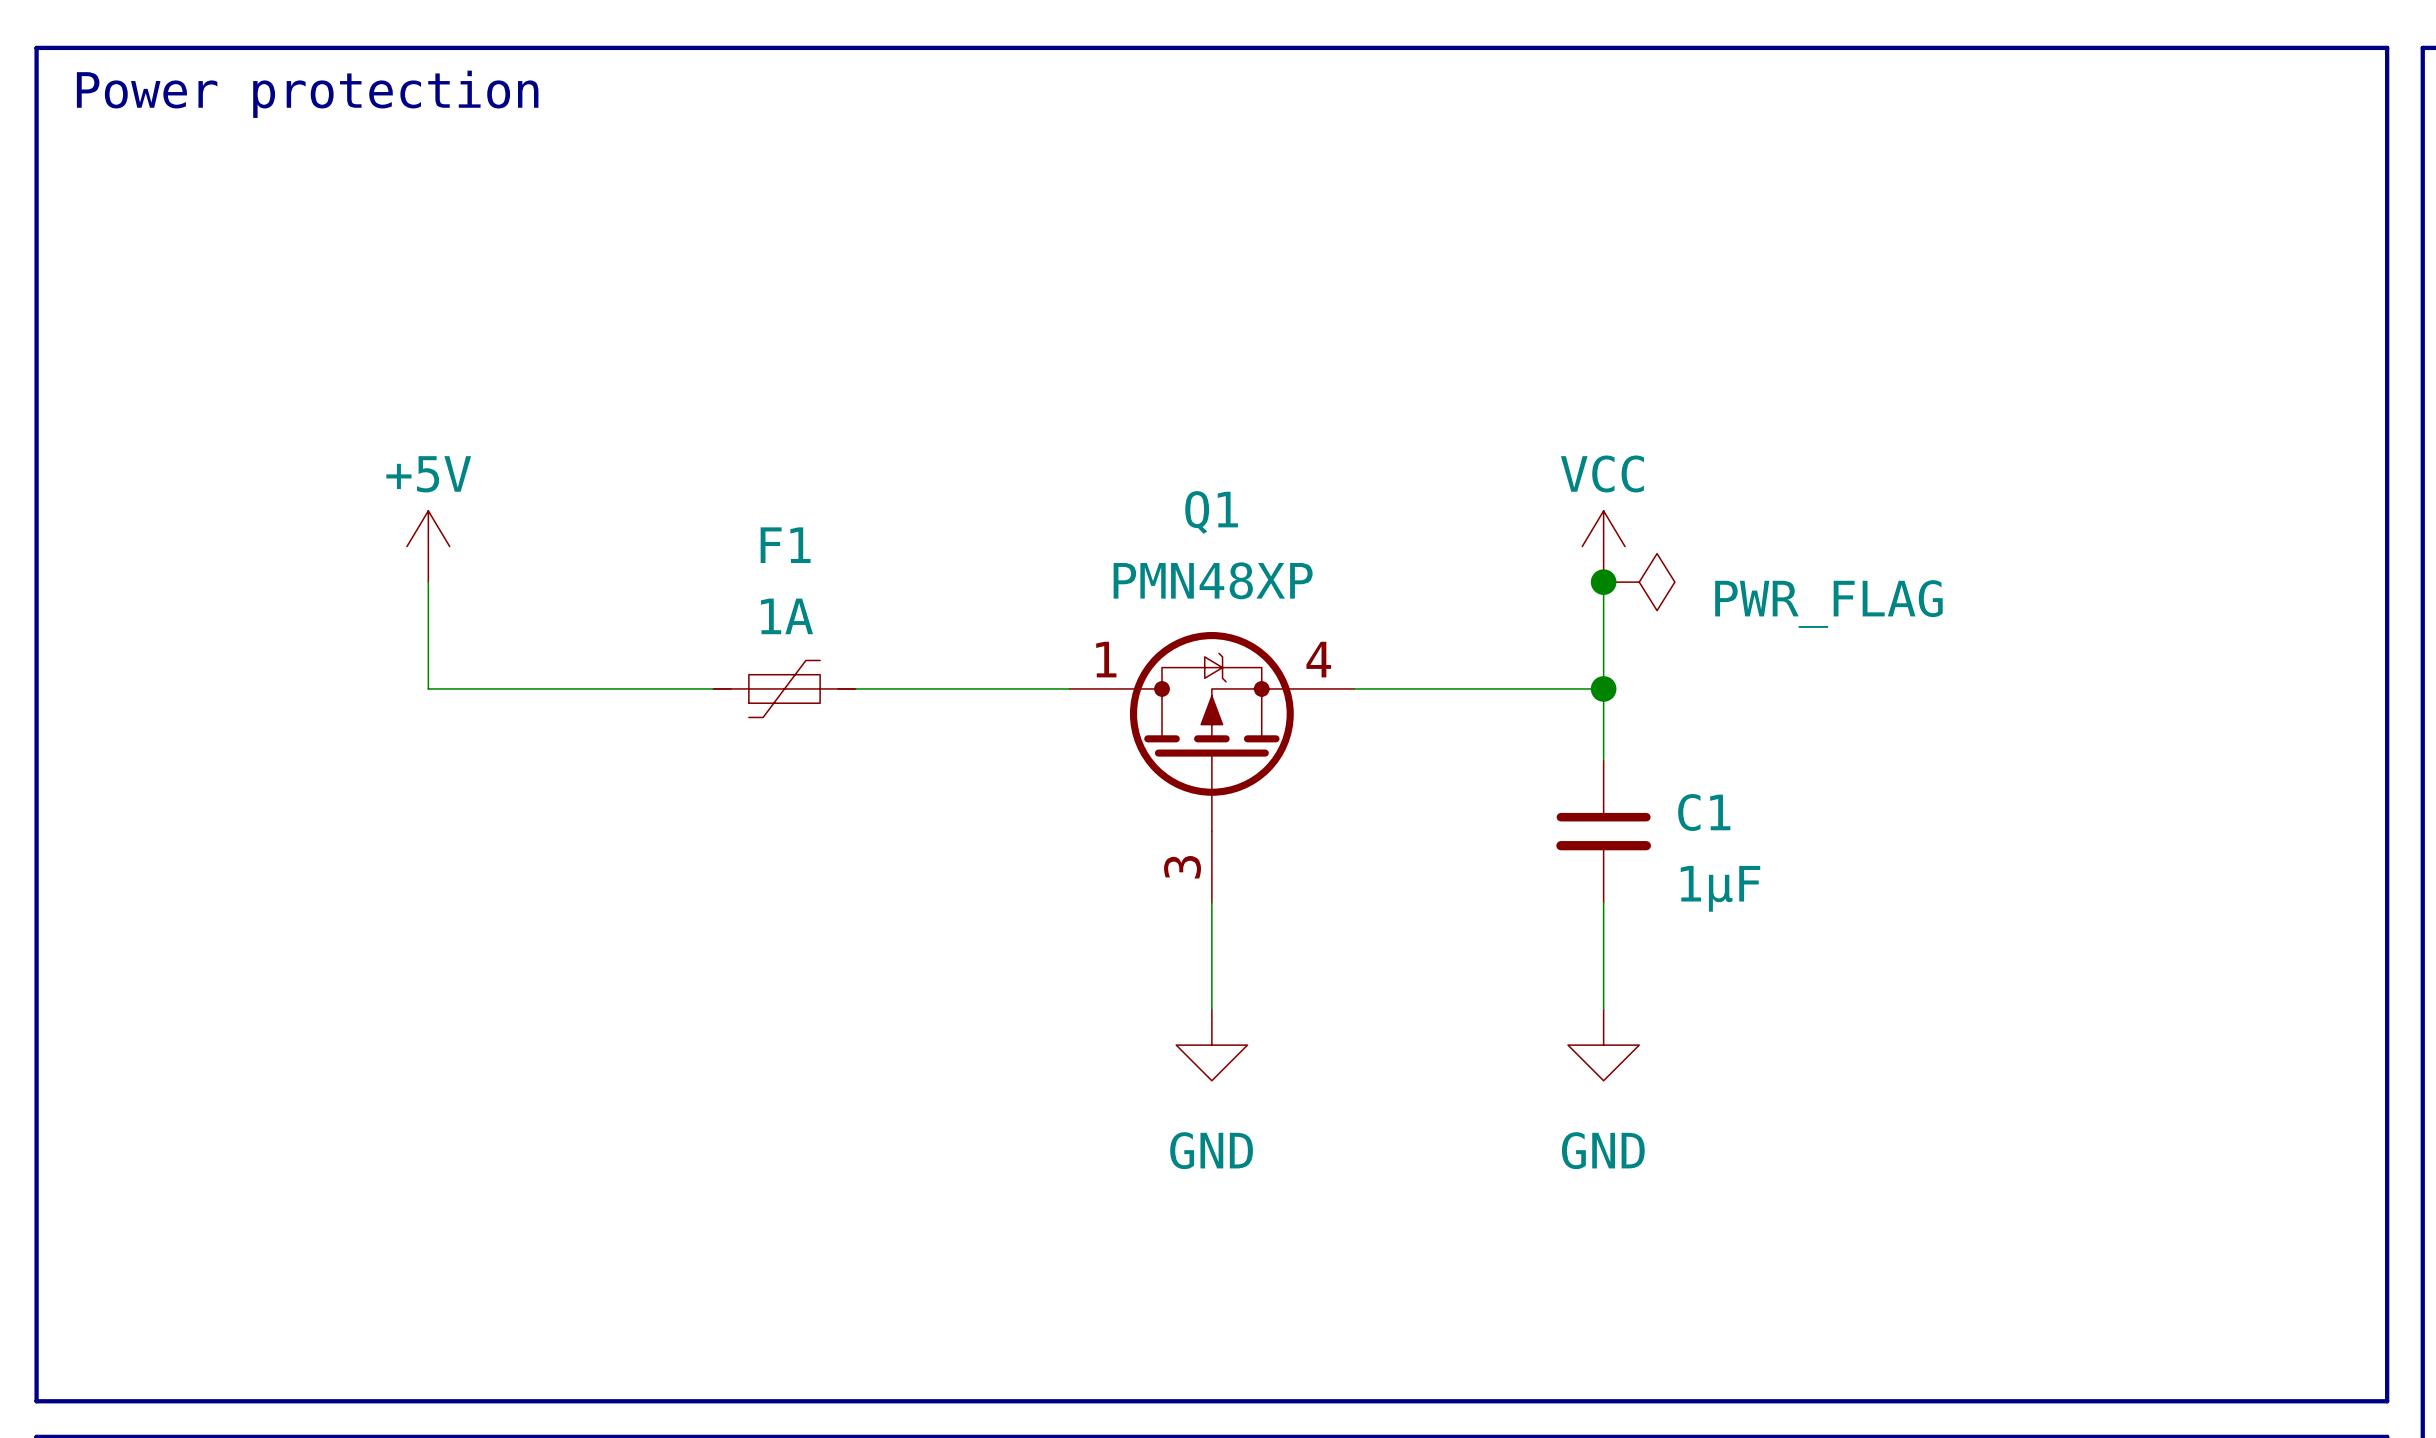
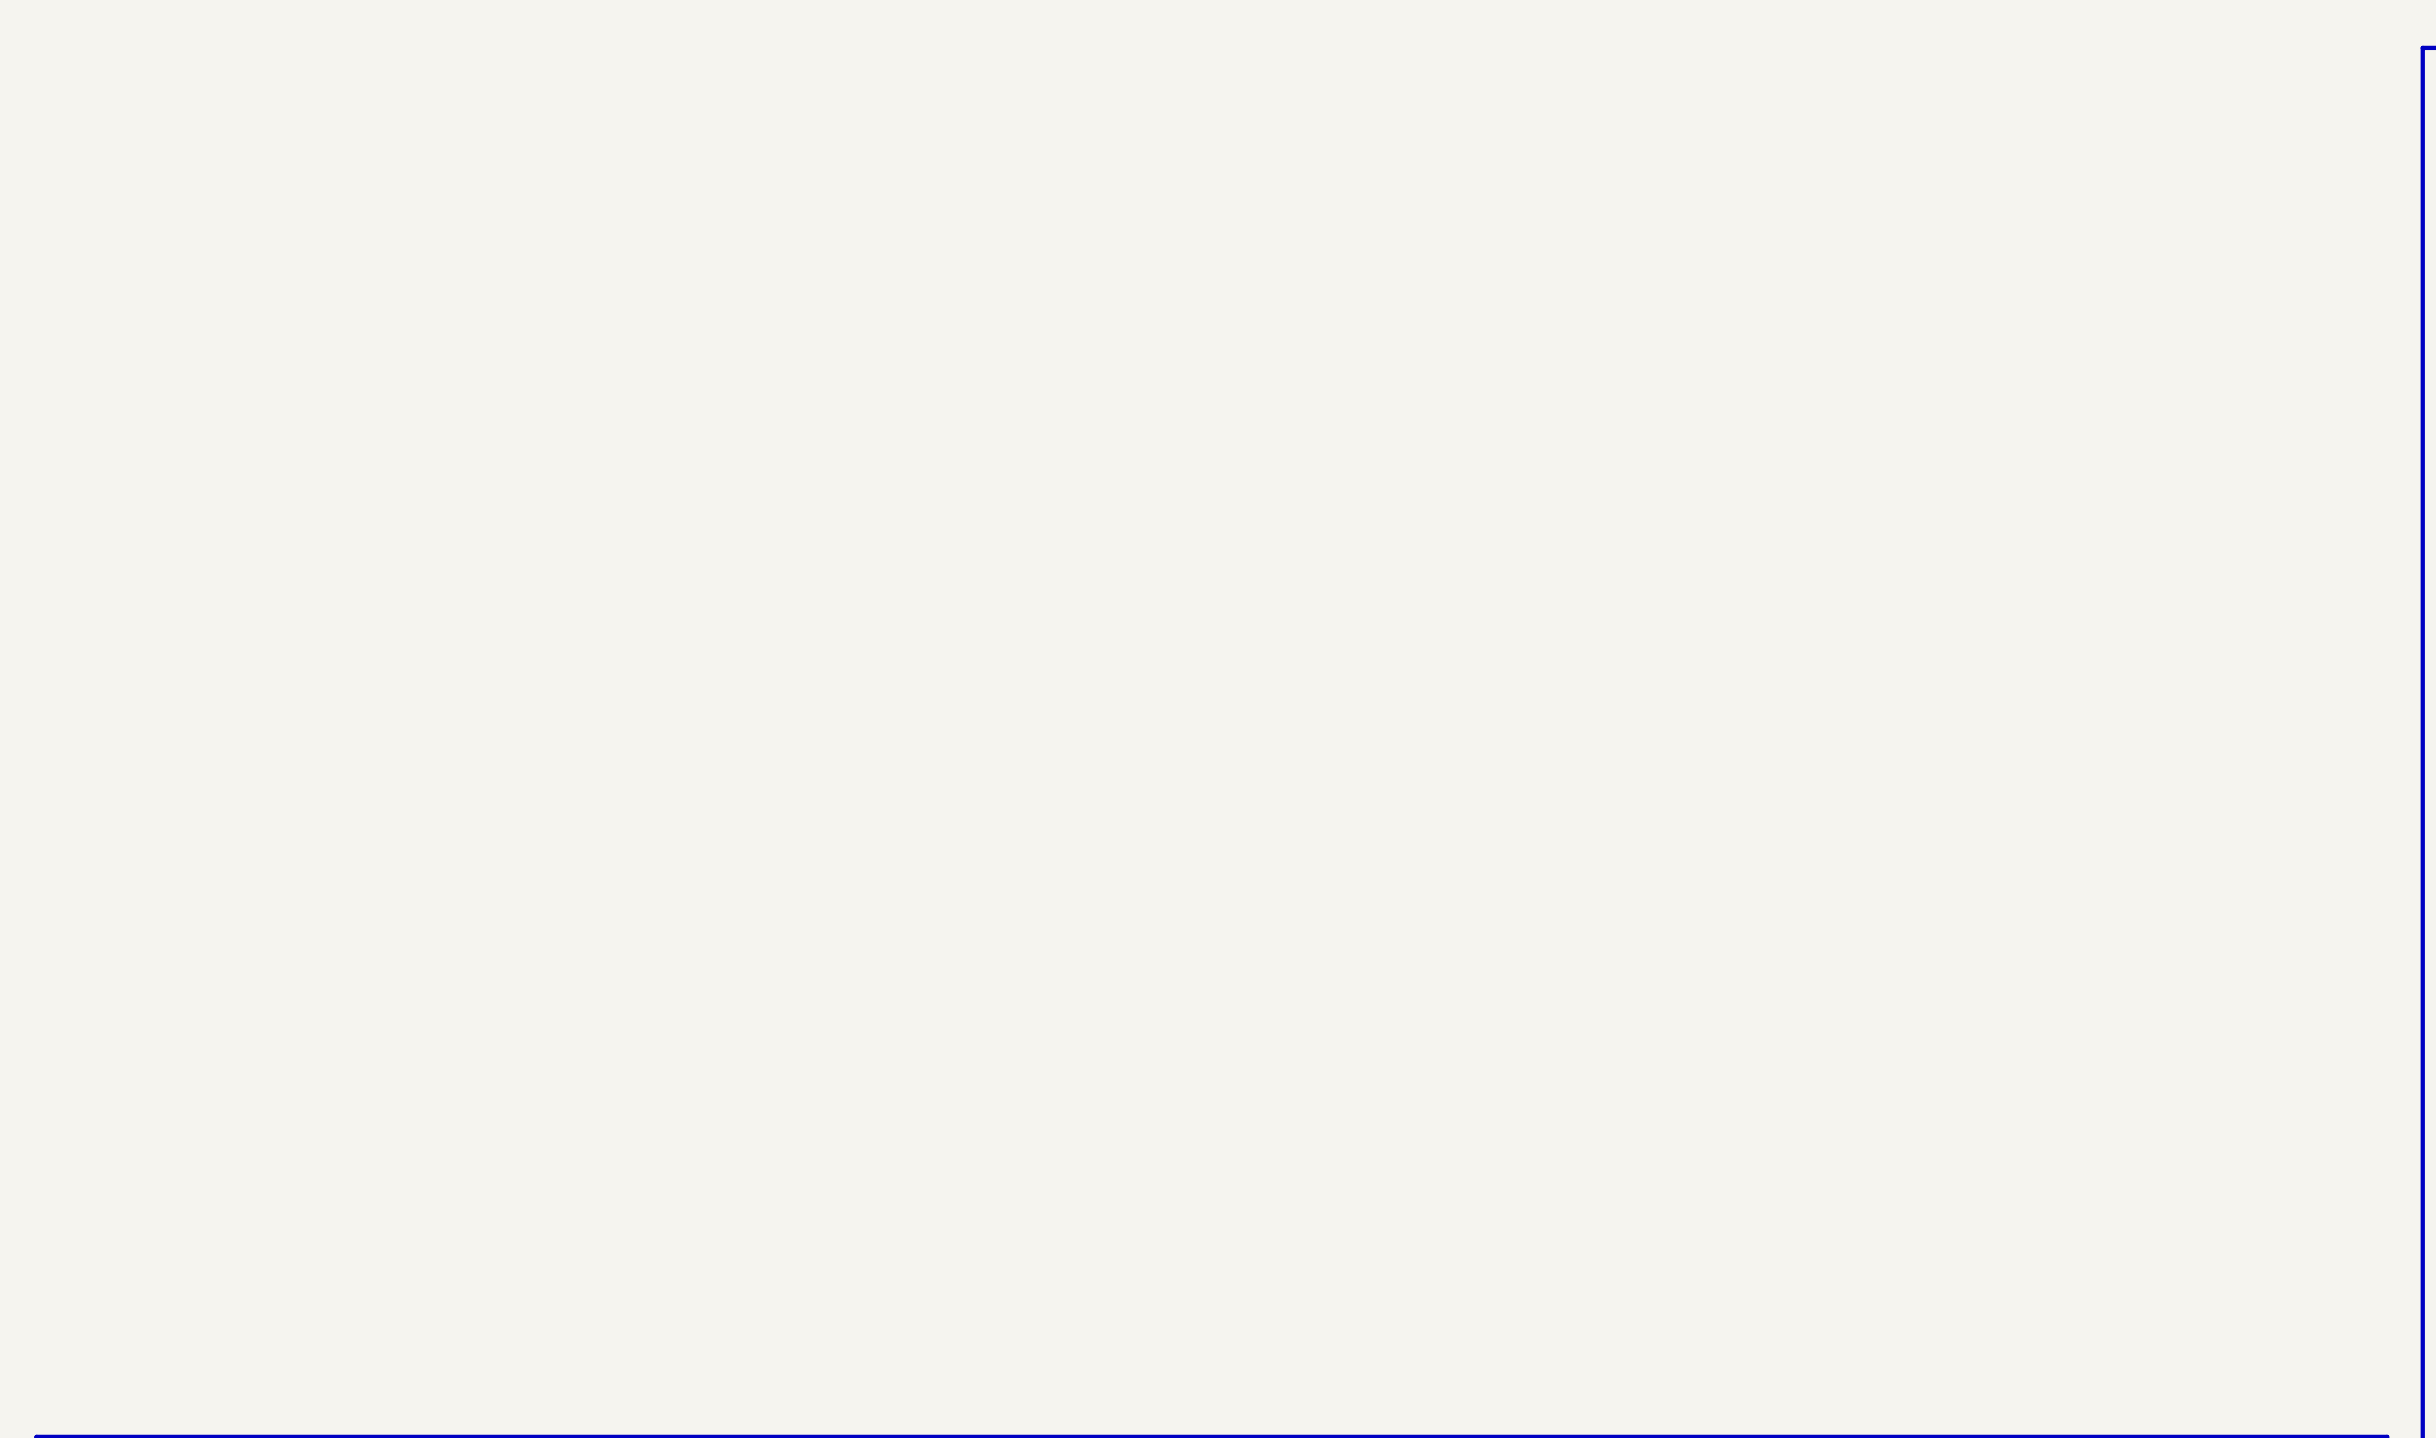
line: (36, 47) (2387, 47) (2387, 1401) (36, 1401) (36, 47) -> none
text: Power protection (307, 94) -> none
power symbol: +5V (428, 546) -> none
power symbol: VCC (1603, 546) -> none
wire: (428, 582) (428, 688) (713, 688) -> none
wire: (1603, 582) (1603, 760) -> none
junction: (1603, 582) -> none
power symbol: PWR_FLAG (1639, 582) -> none
F1: 1A (784, 688) -> none
wire: (855, 688) (1069, 688) -> none
wire: (1354, 688) (1603, 688) -> none
junction: (1603, 688) -> none
Q1: PMN48XP (1211, 767) -> none
C1: 1µF (1603, 831) -> none
wire: (1211, 902) (1211, 1009) -> none
wire: (1603, 902) (1603, 1009) -> none
power symbol: GND (1211, 1045) -> none
power symbol: GND (1603, 1045) -> none

